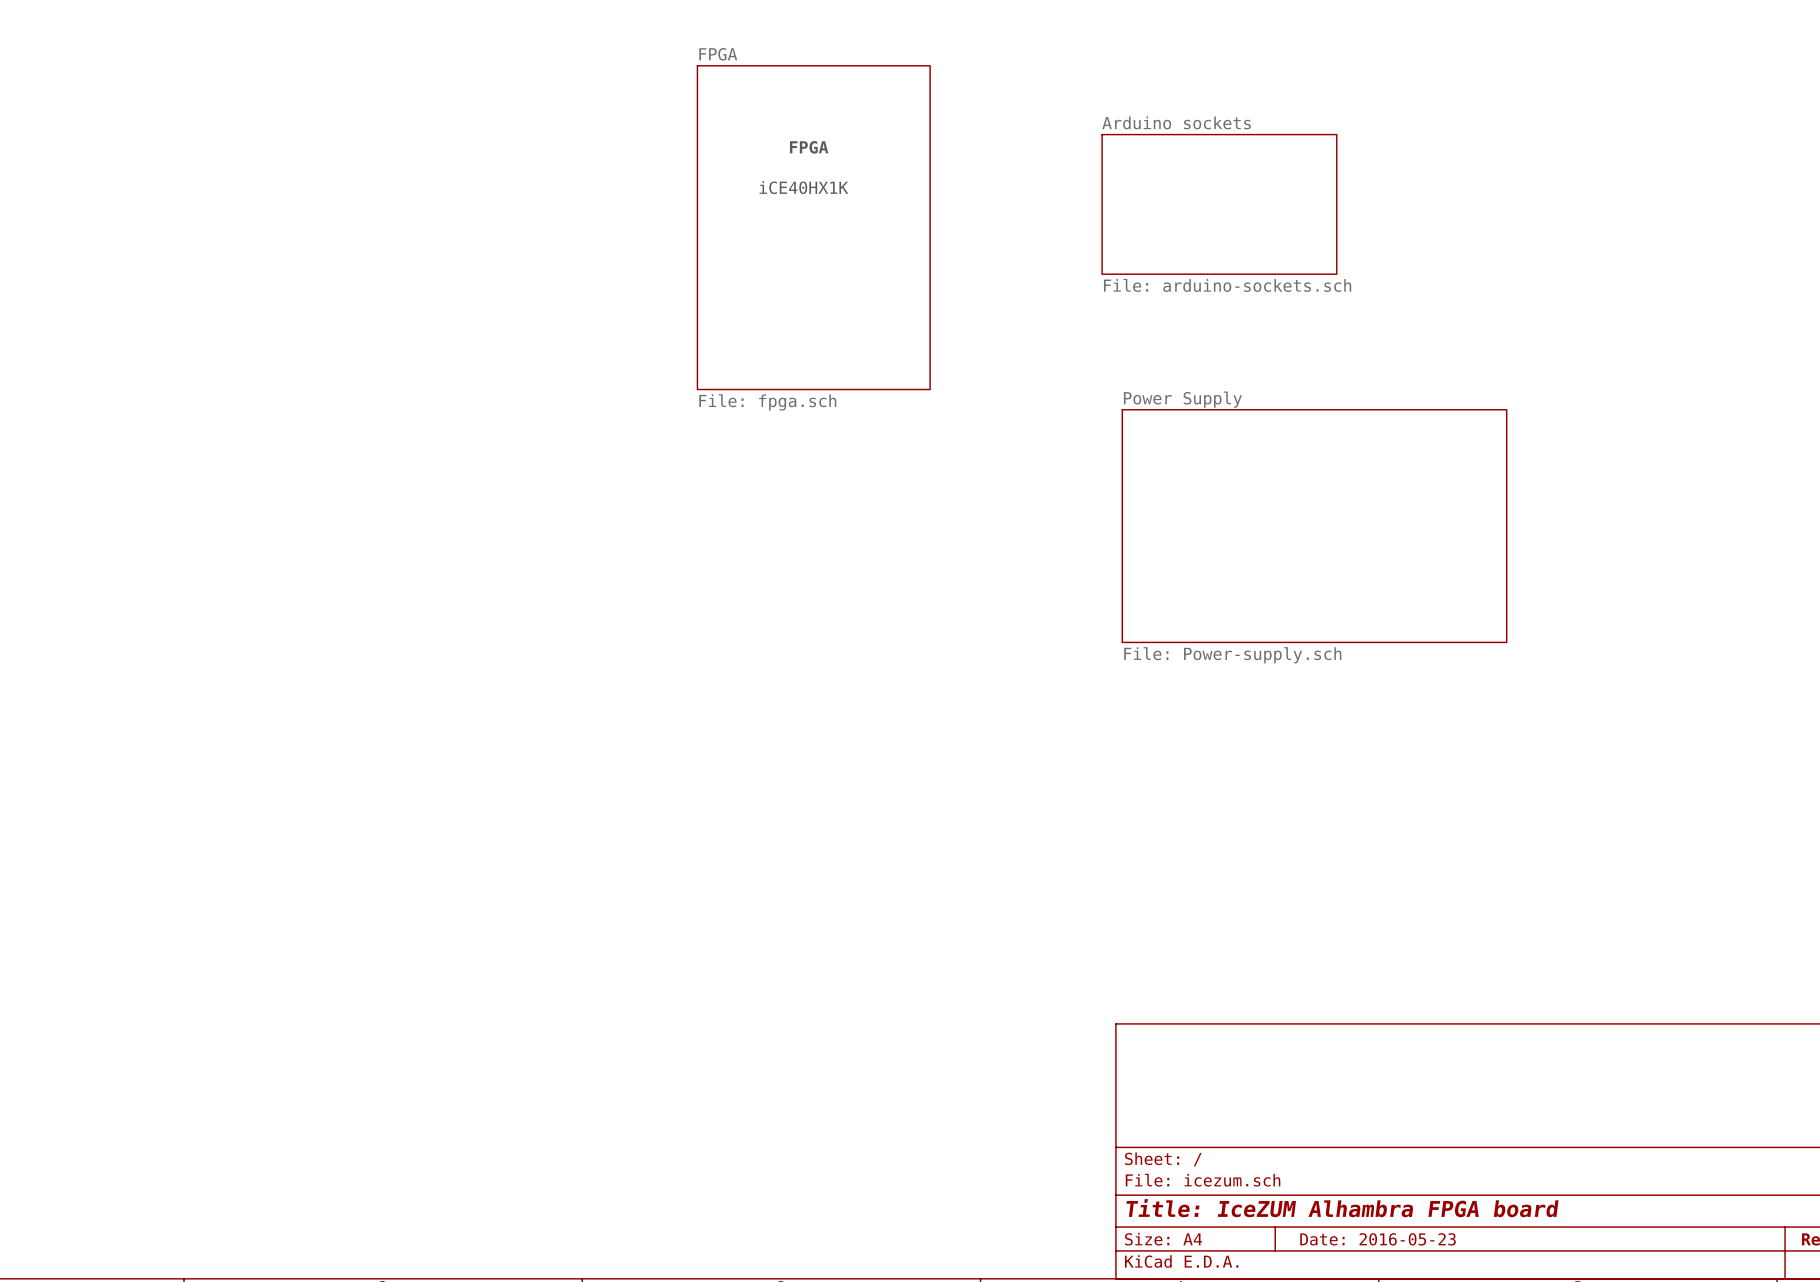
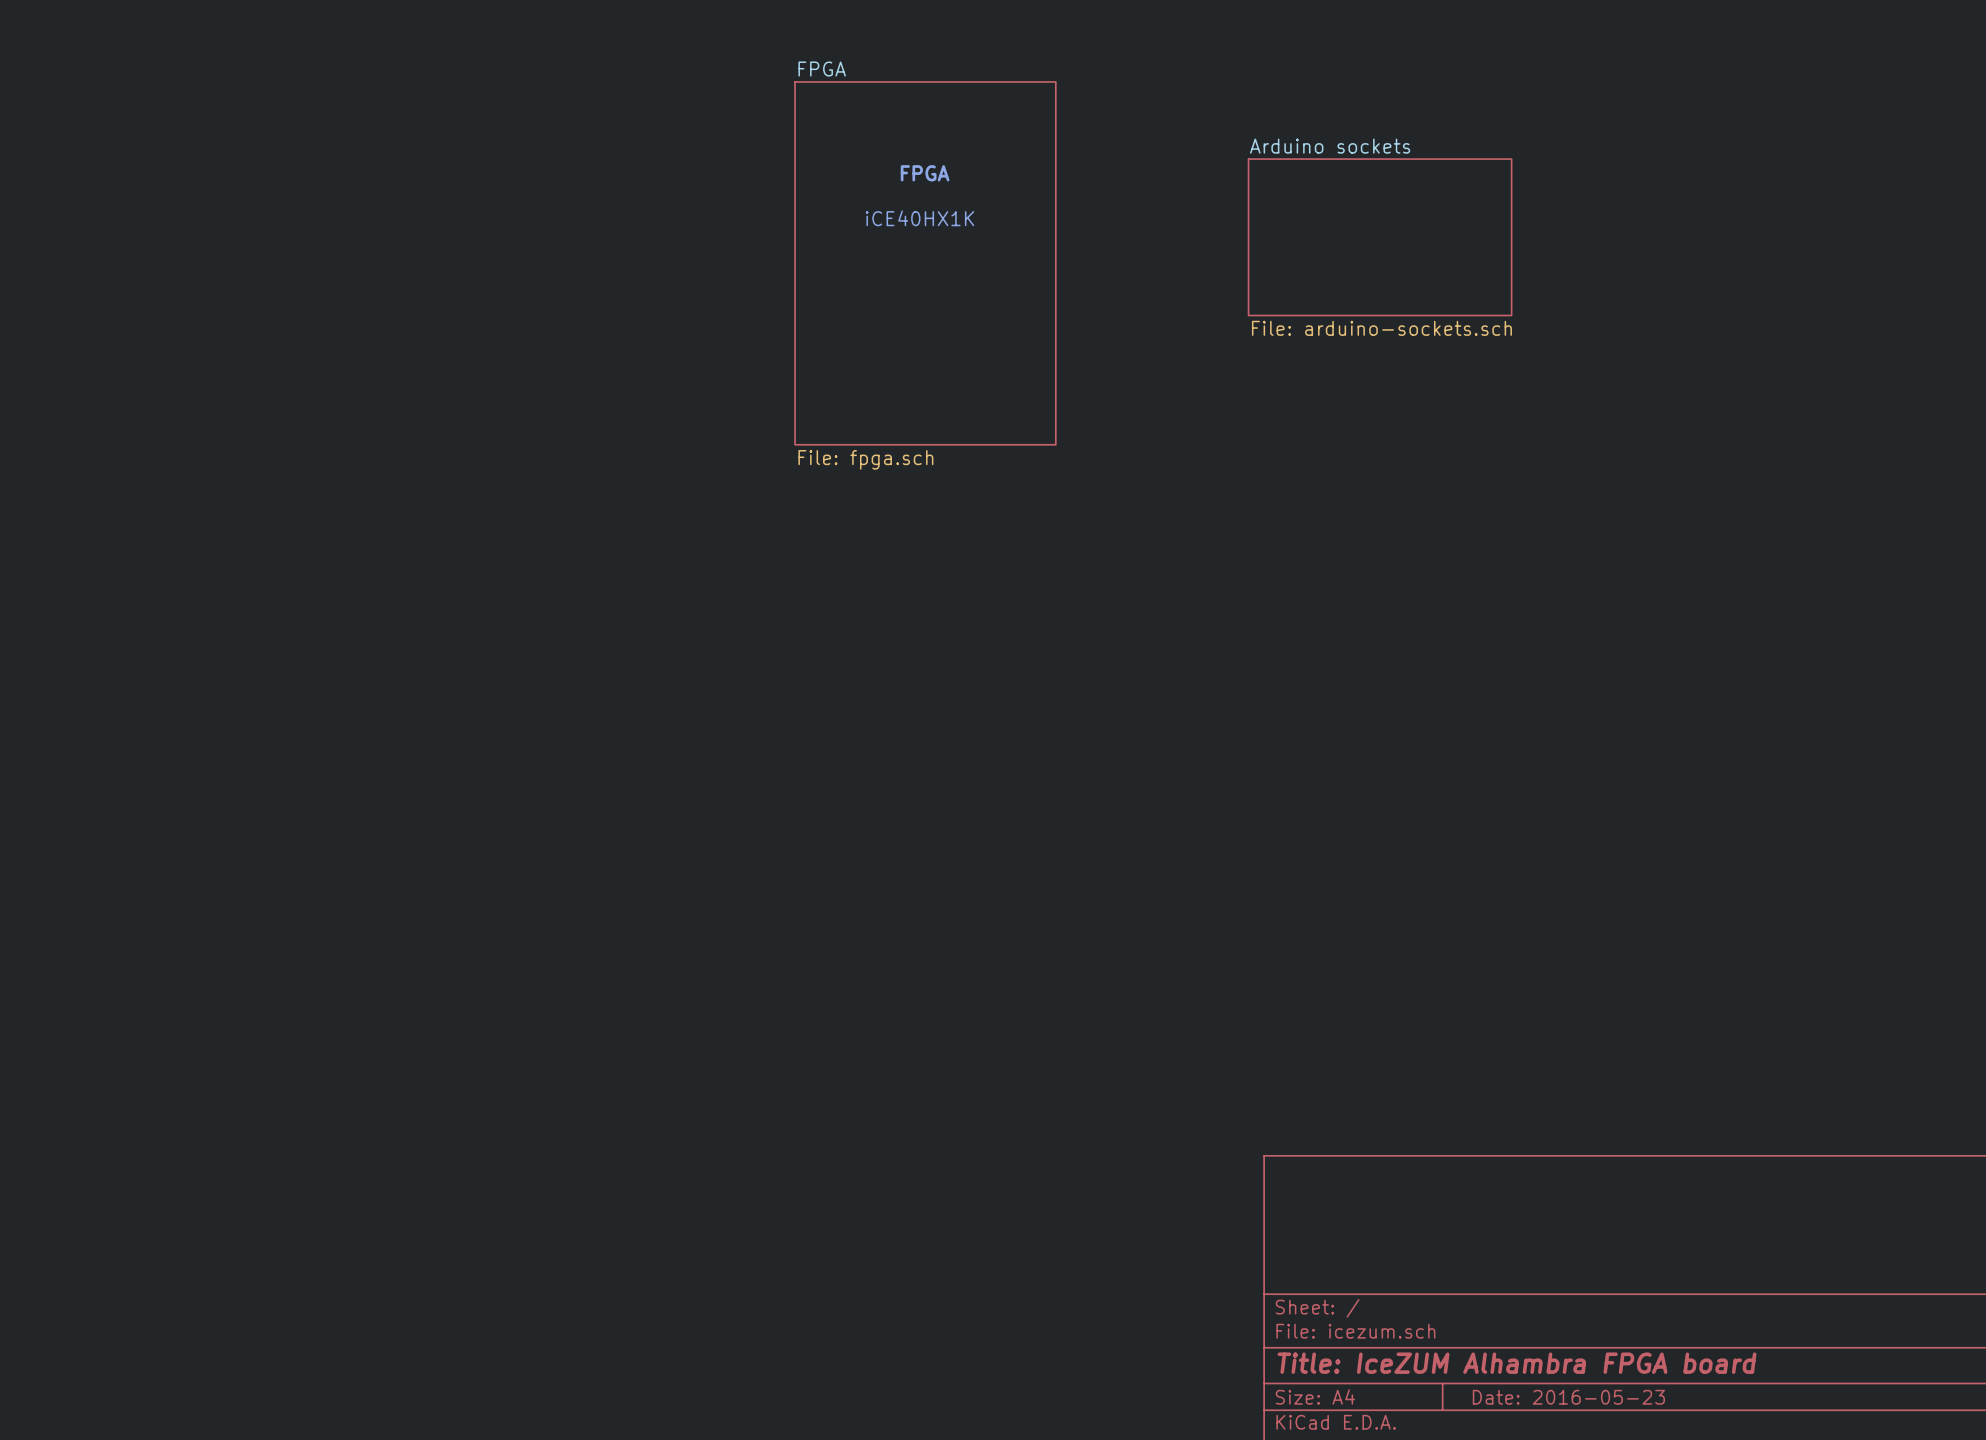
sheet Power Supply: File: Power-supply.sch (1314, 526) -> none

